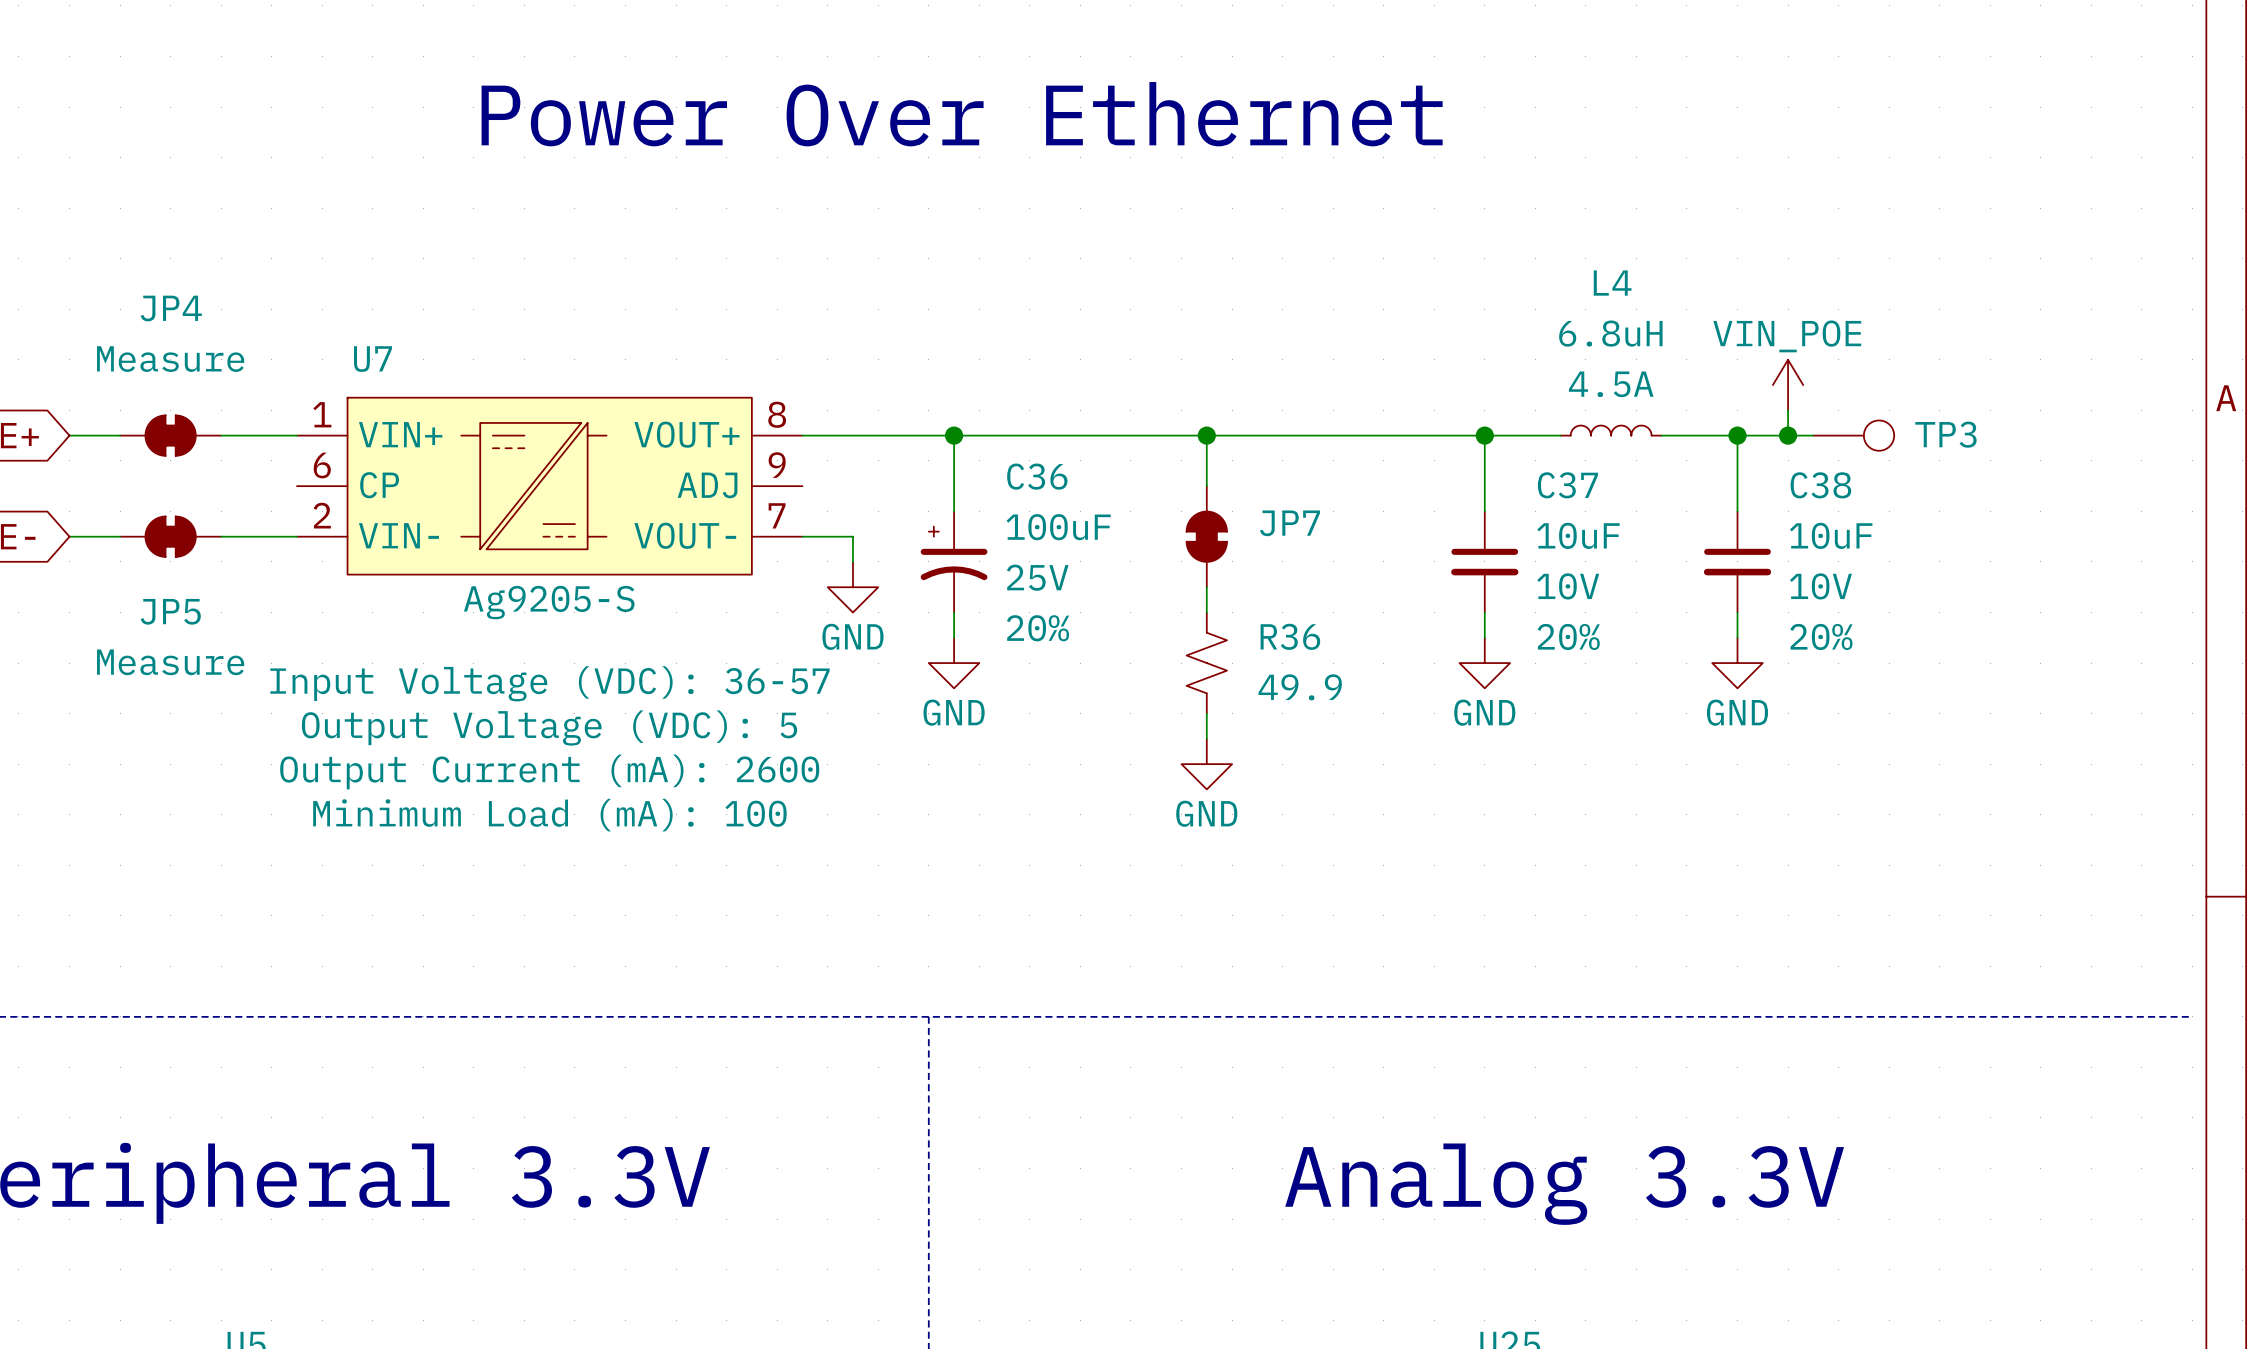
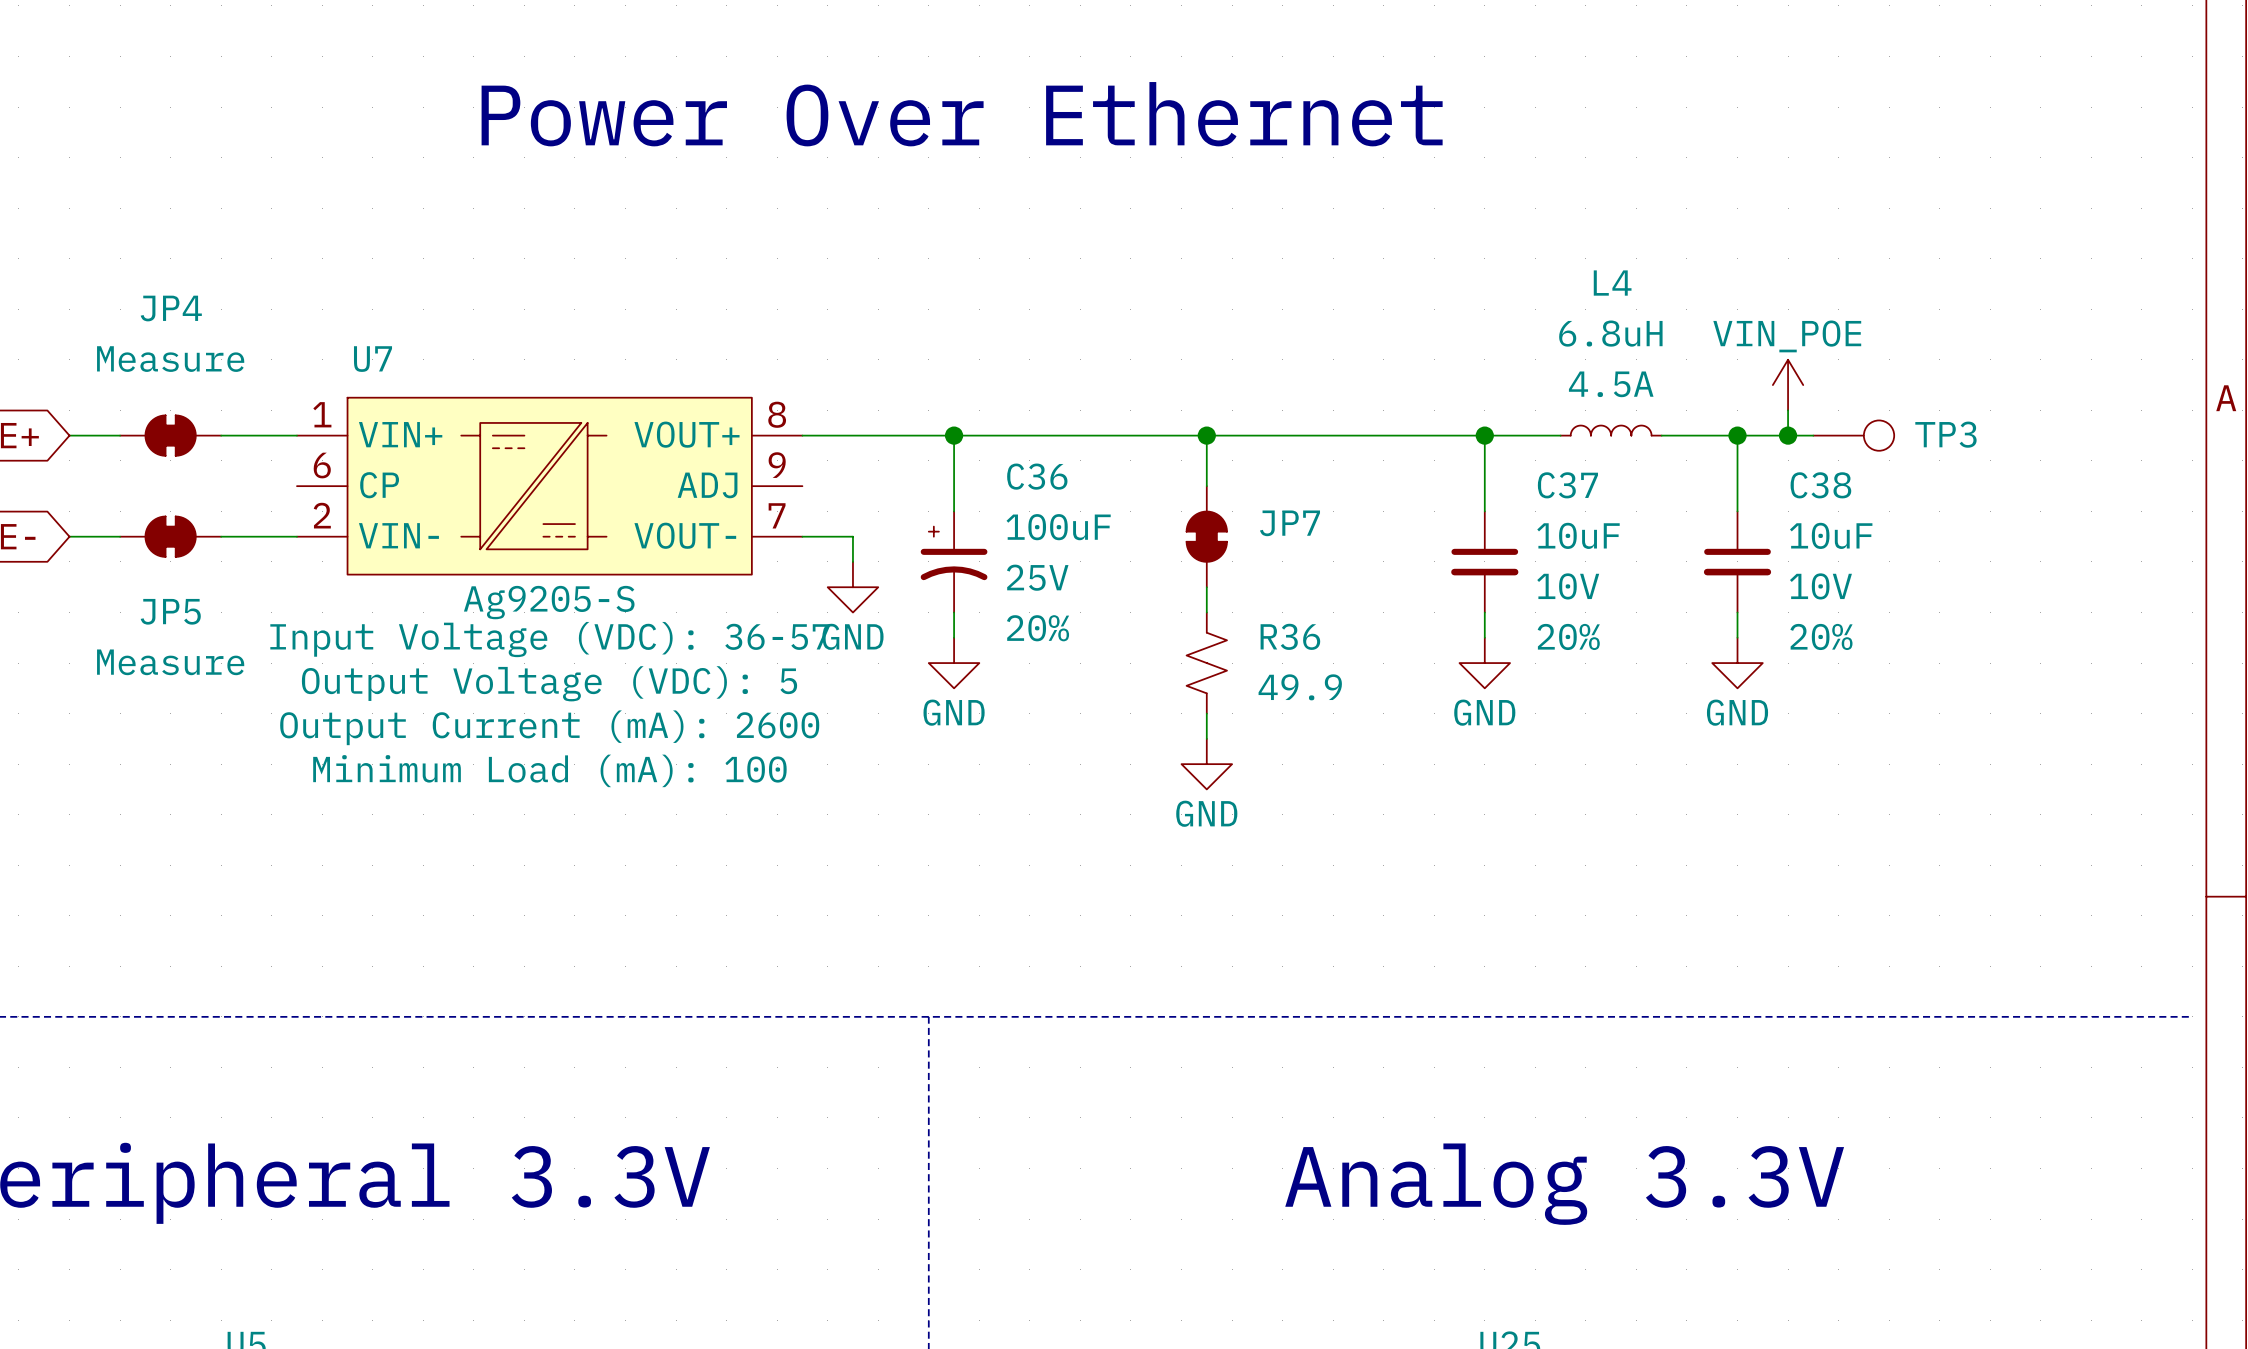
U7 text position: Input Voltage (VDC): 36-57 (549, 683) -> Input Voltage (VDC): 36-57 (549, 639)
U7 text position: Output Voltage (VDC): 5 (549, 728) -> Output Voltage (VDC): 5 (549, 683)
U7 text position: Output Current (mA): 2600 (549, 772) -> Output Current (mA): 2600 (549, 727)
U7 text position: Minimum Load (mA): 100 (549, 815) -> Minimum Load (mA): 100 (549, 770)

